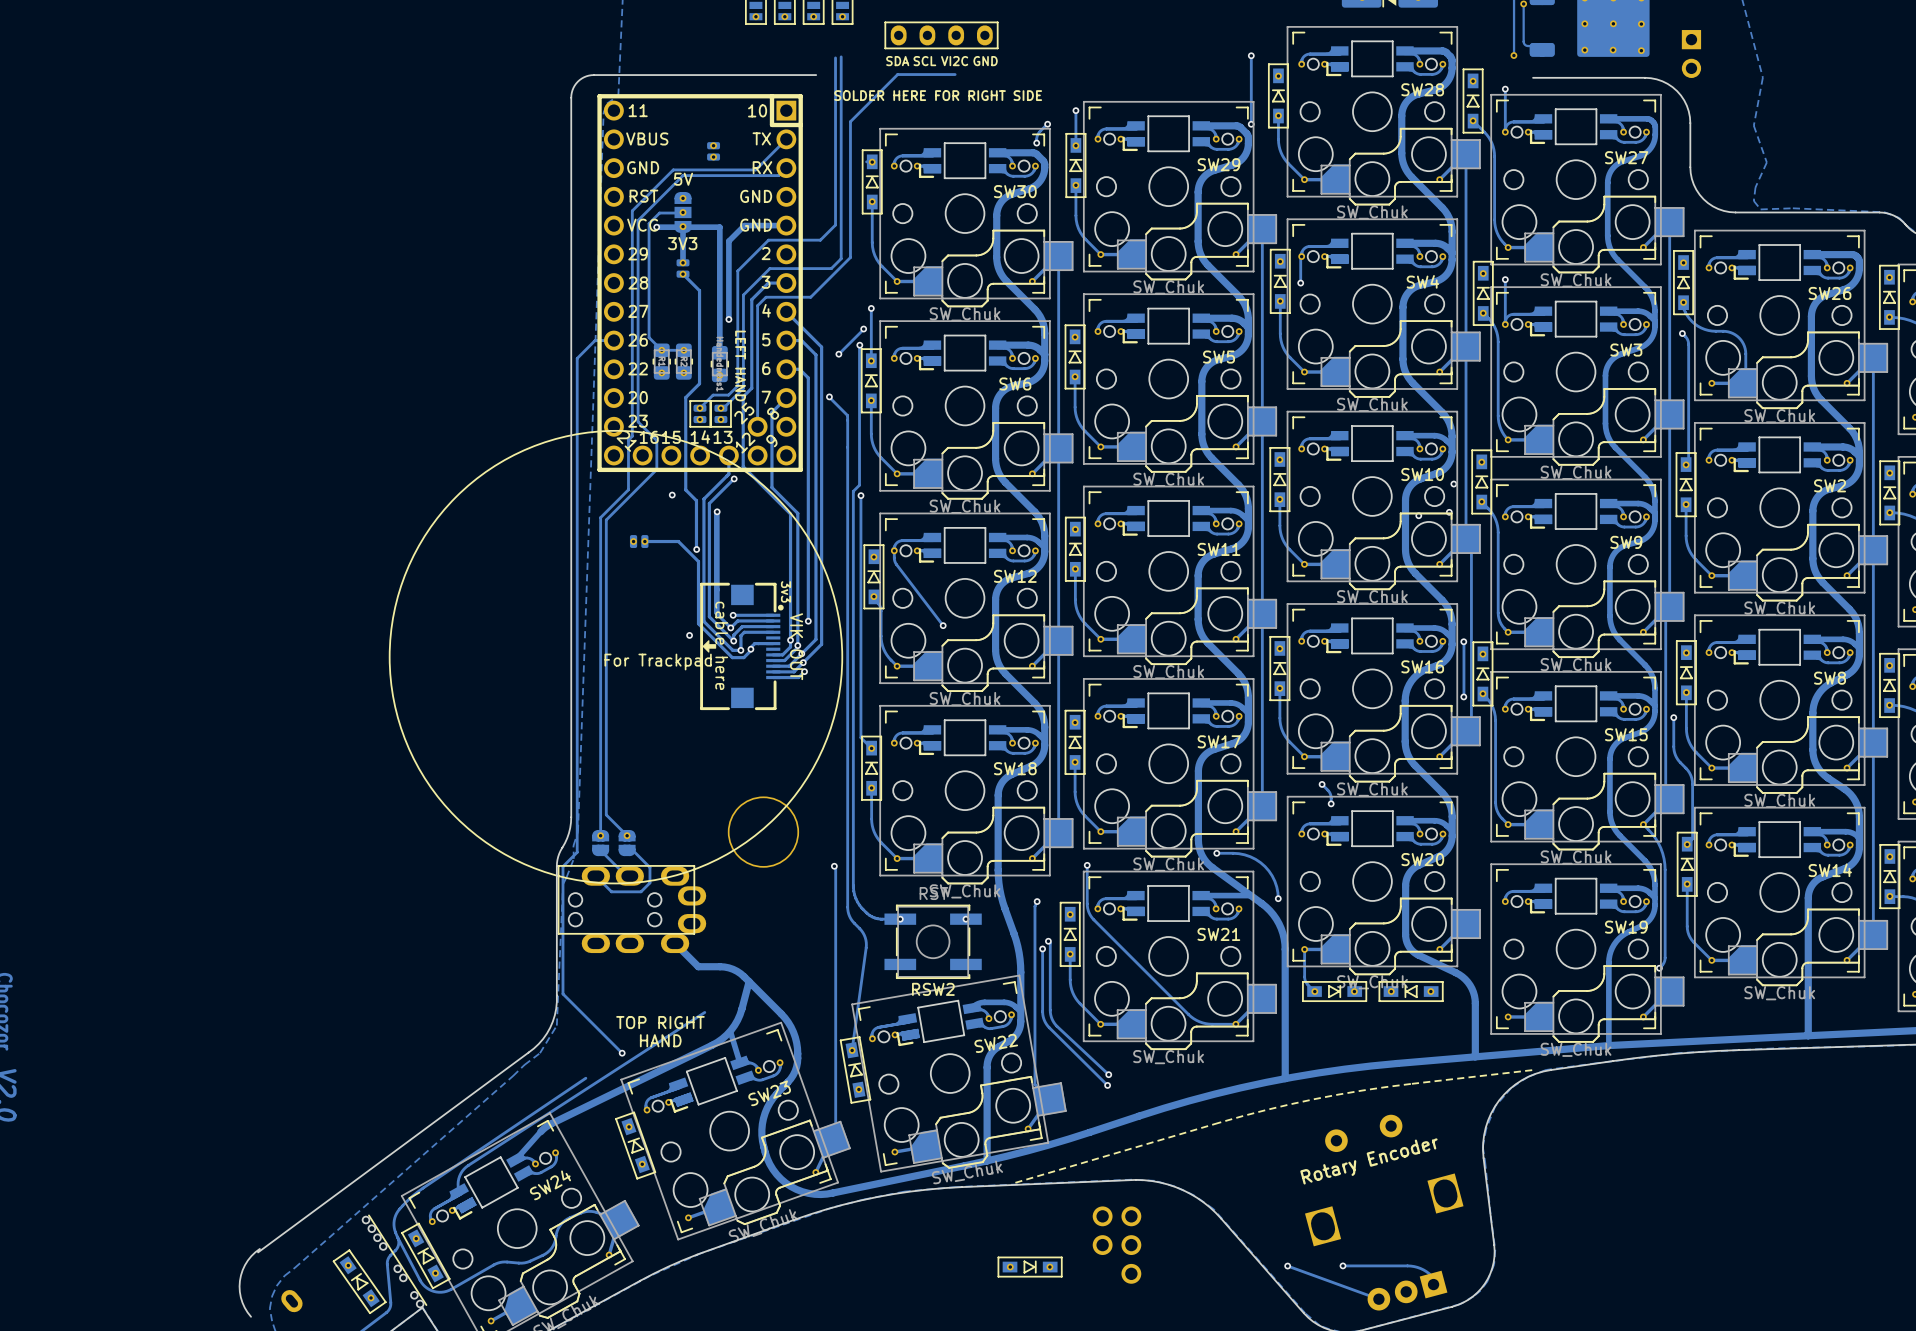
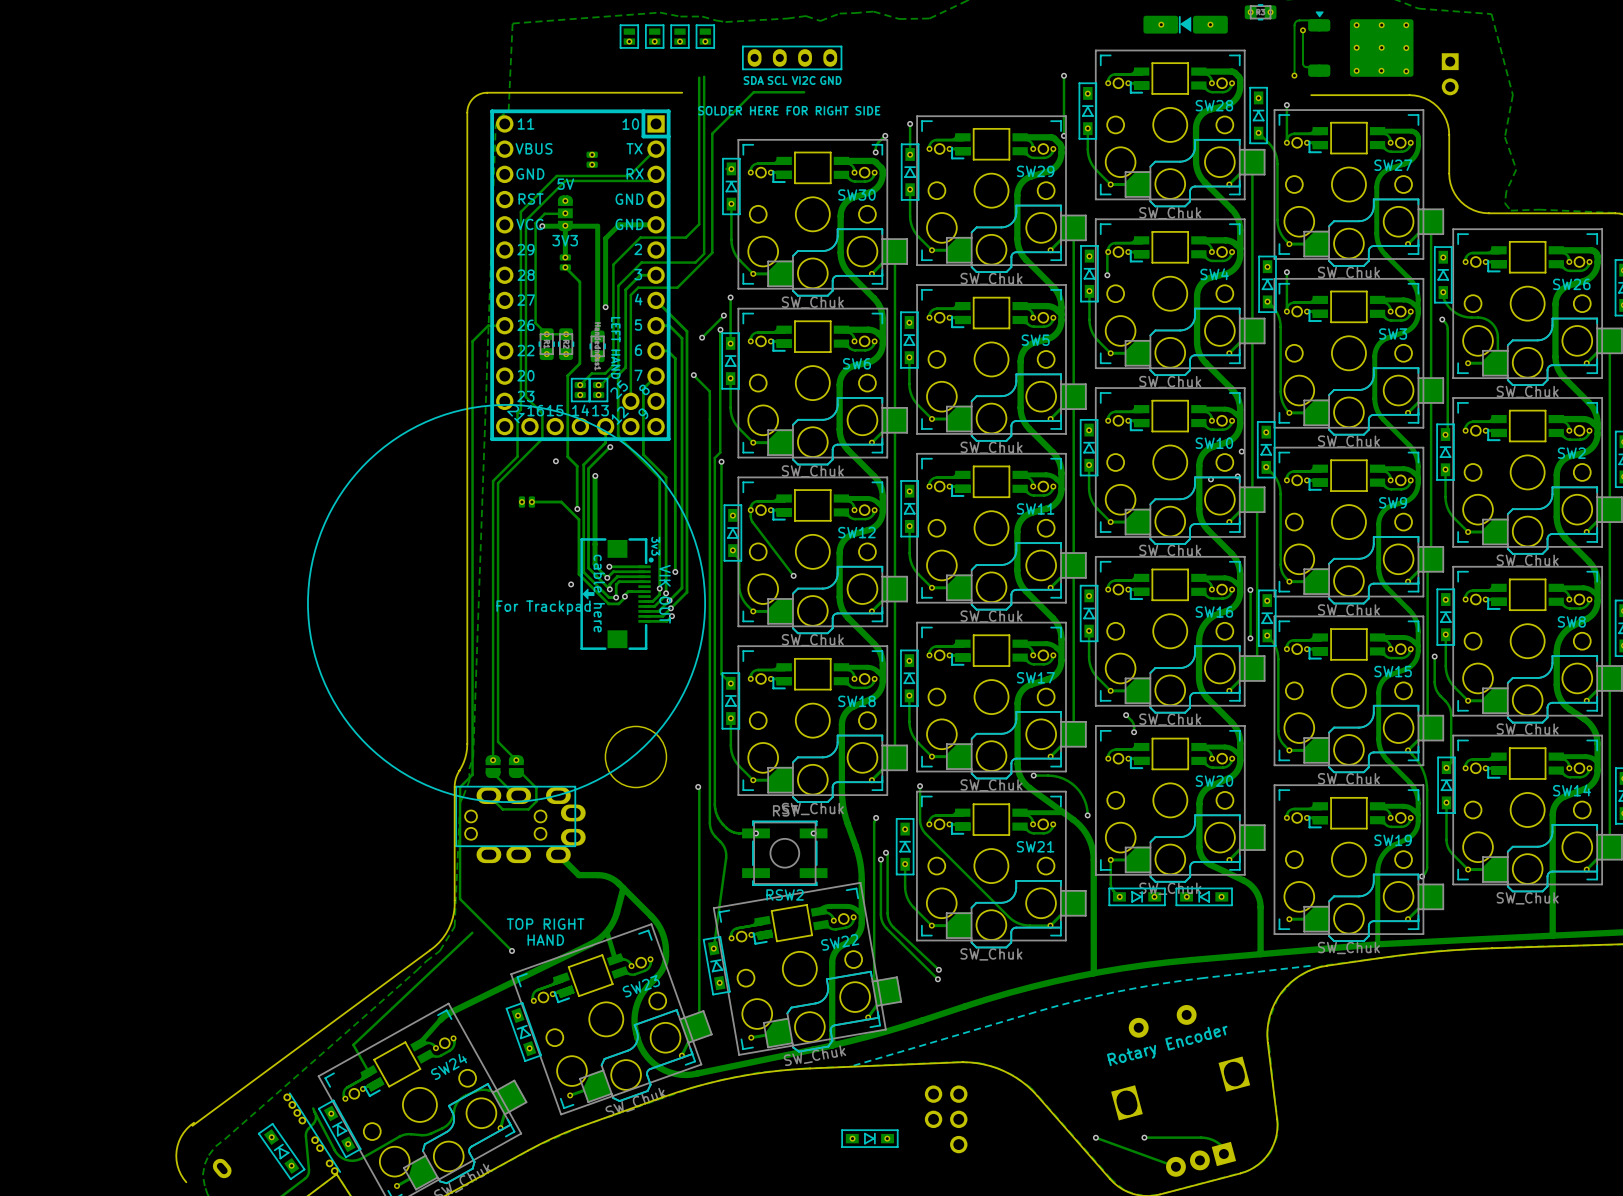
track: (704, 1012) (468, 1165) (459, 1176) (459, 1191) -> (472, 932) (353, 1044) (368, 1072)
track: (585, 1078) (417, 1192) (396, 1213) (394, 1222) (395, 1232) -> none

